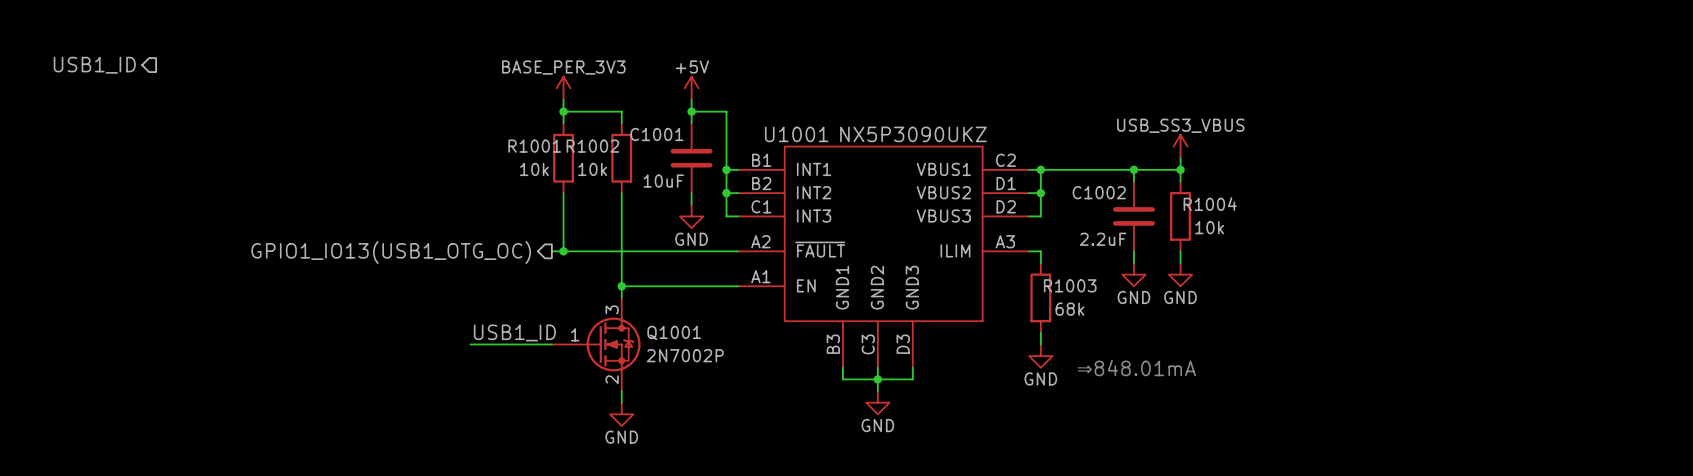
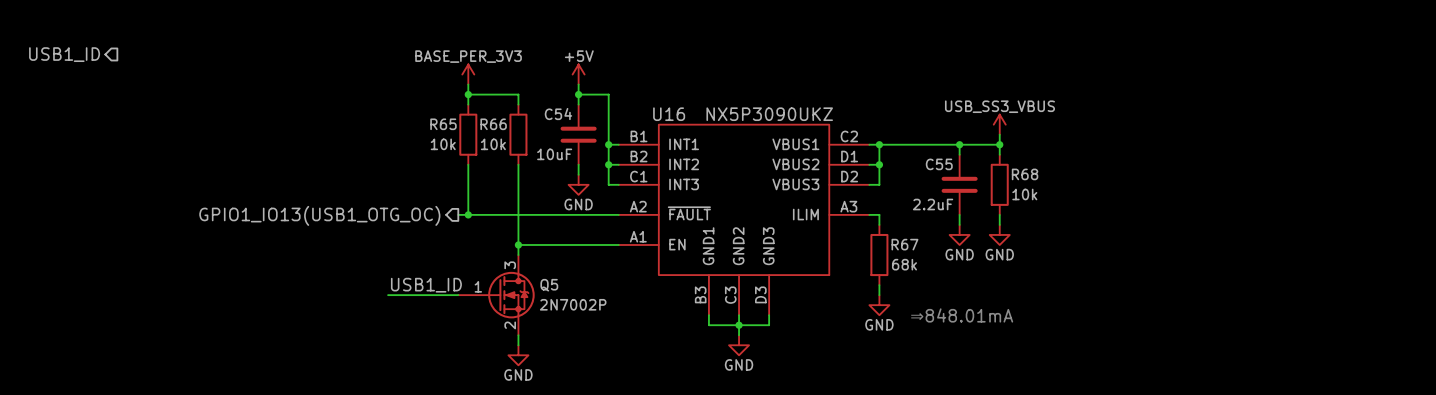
C1001 name: C1001 (656, 134) -> C54 (558, 114)
U1001 name: U1001 (796, 134) -> U16 (669, 114)
R1001 name: R1001 (534, 146) -> R65 (443, 124)
R1002 name: R1002 (592, 146) -> R66 (493, 124)
C1002 name: C1002 (1099, 192) -> C55 (939, 164)
R1004 name: R1004 (1210, 204) -> R68 (1025, 174)
R1003 name: R1003 (1070, 285) -> R67 (904, 244)
Q1001 name: Q1001 (674, 332) -> Q5 (549, 285)

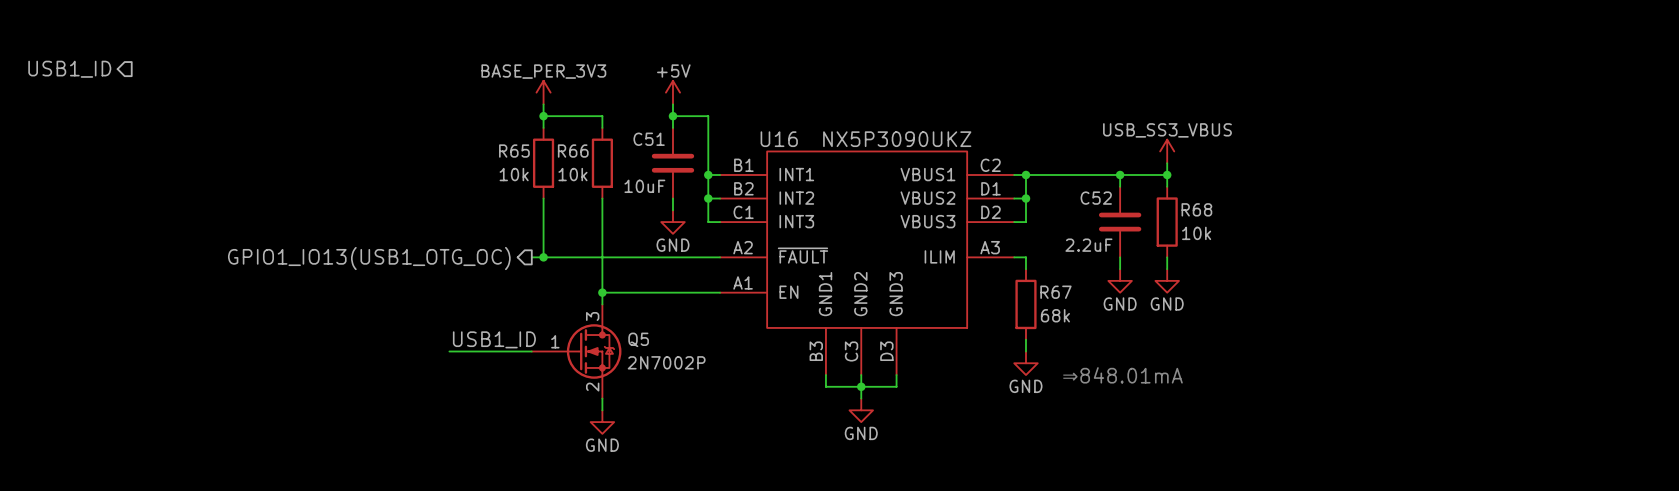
C54 name: C54 (558, 114) -> C51 (649, 139)
C55 name: C55 (939, 164) -> C52 (1096, 198)

